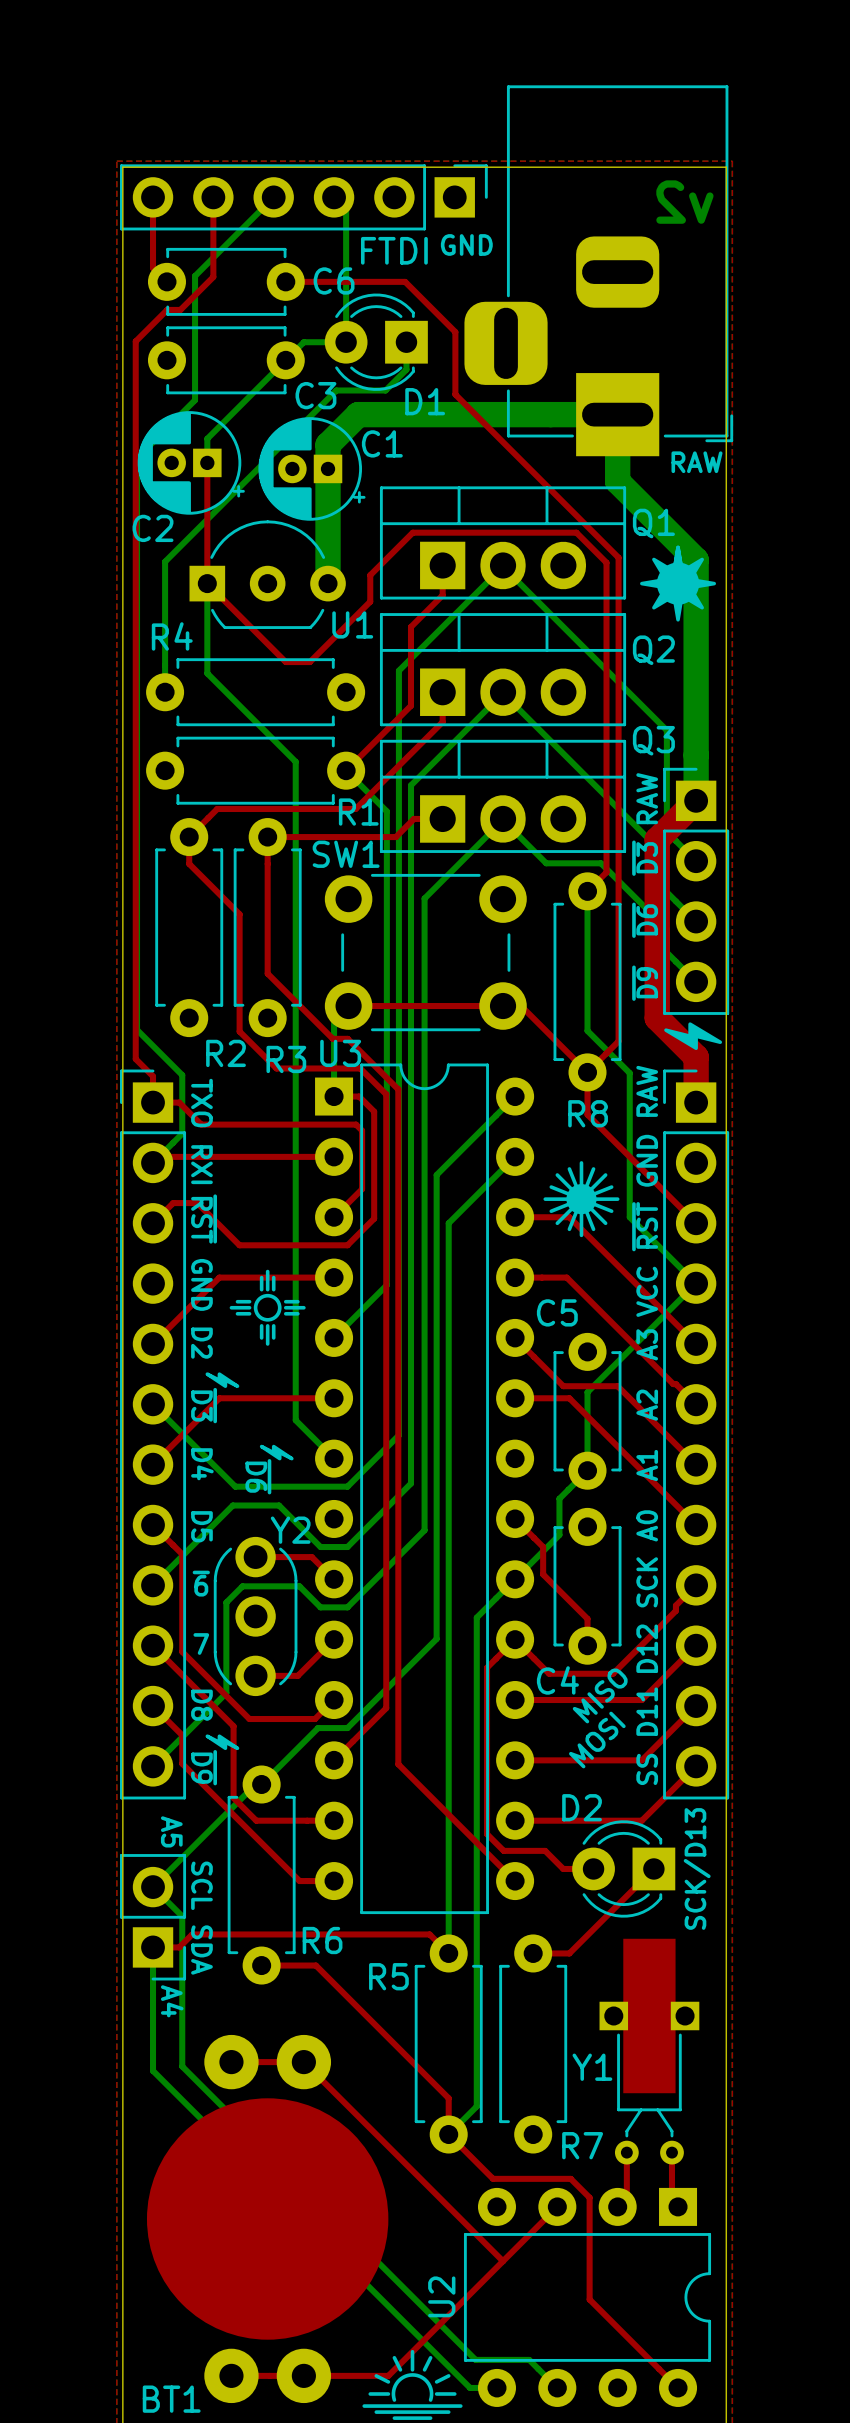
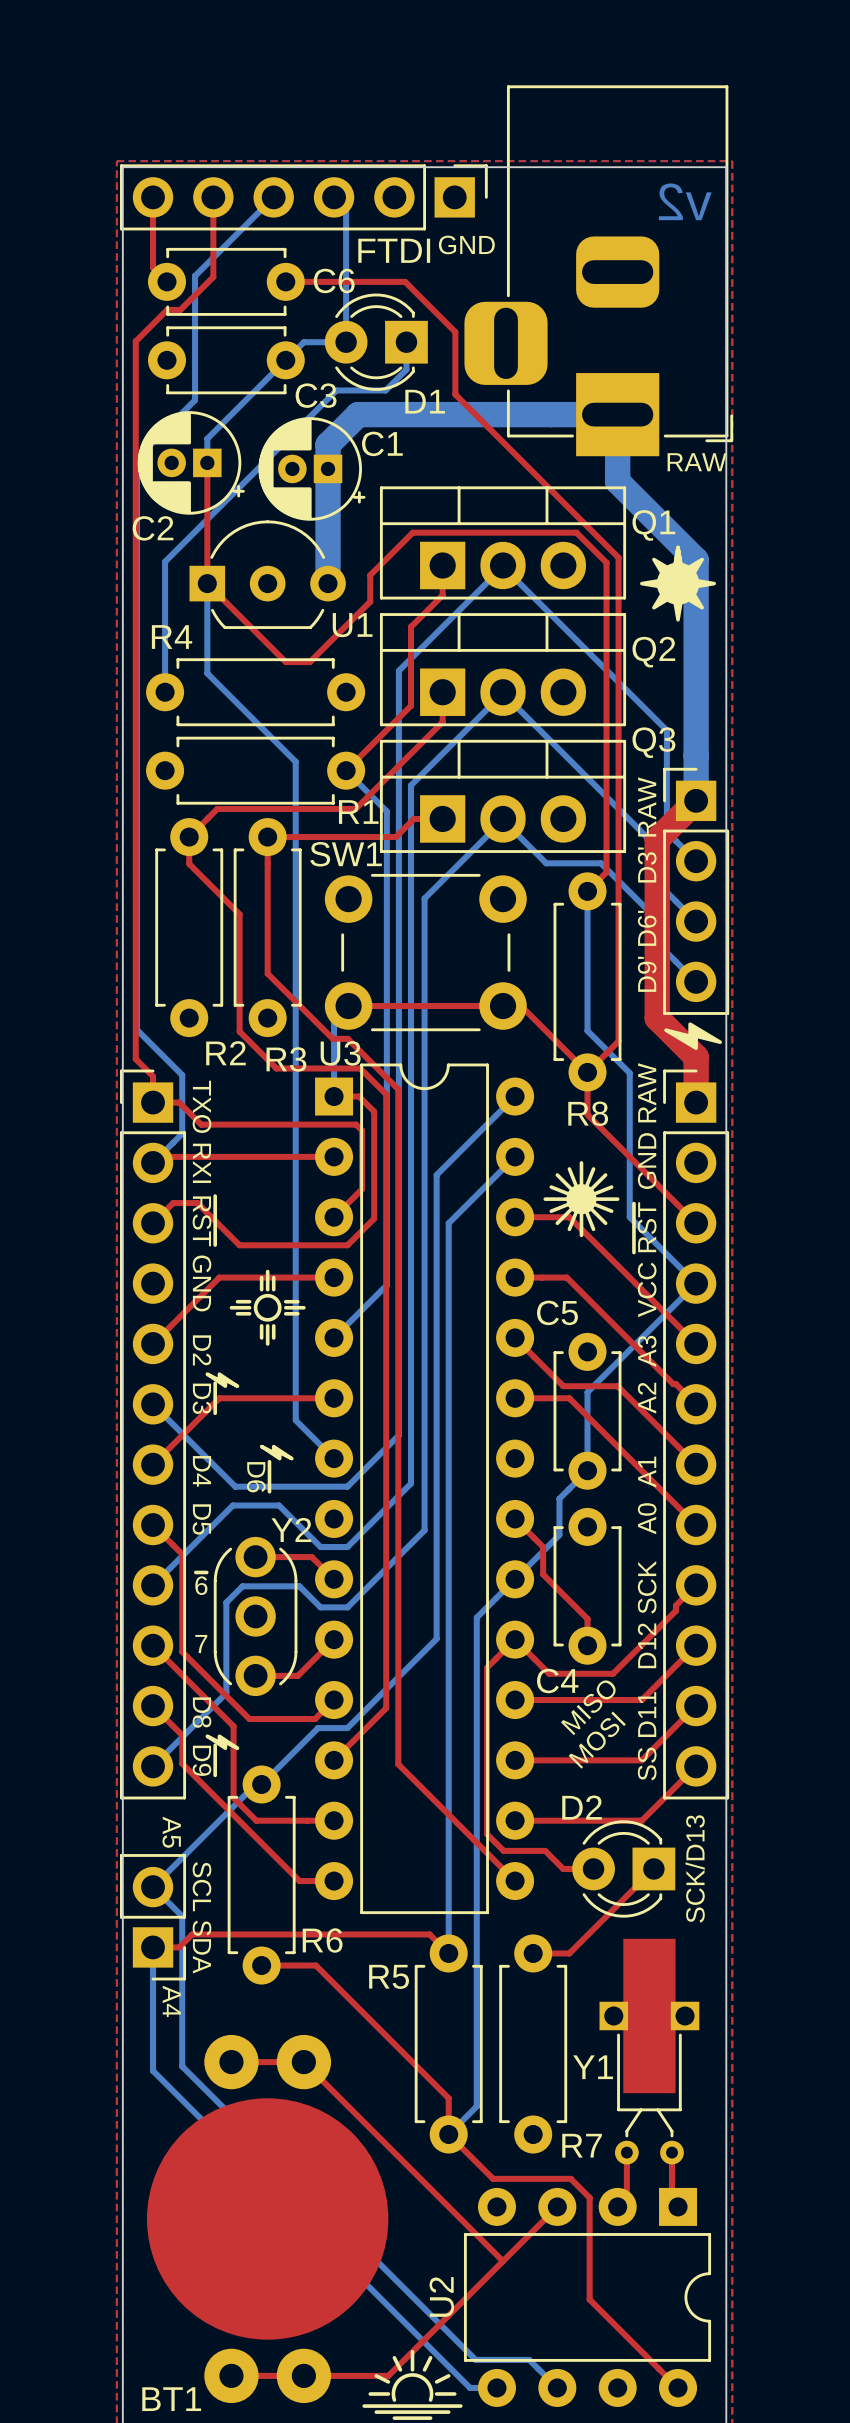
text: ~{D3} RAW (645, 824) -> D3' RAW (647, 829)
text: ~{D9} ~{D6} (645, 951) -> D9' D6' (647, 951)

